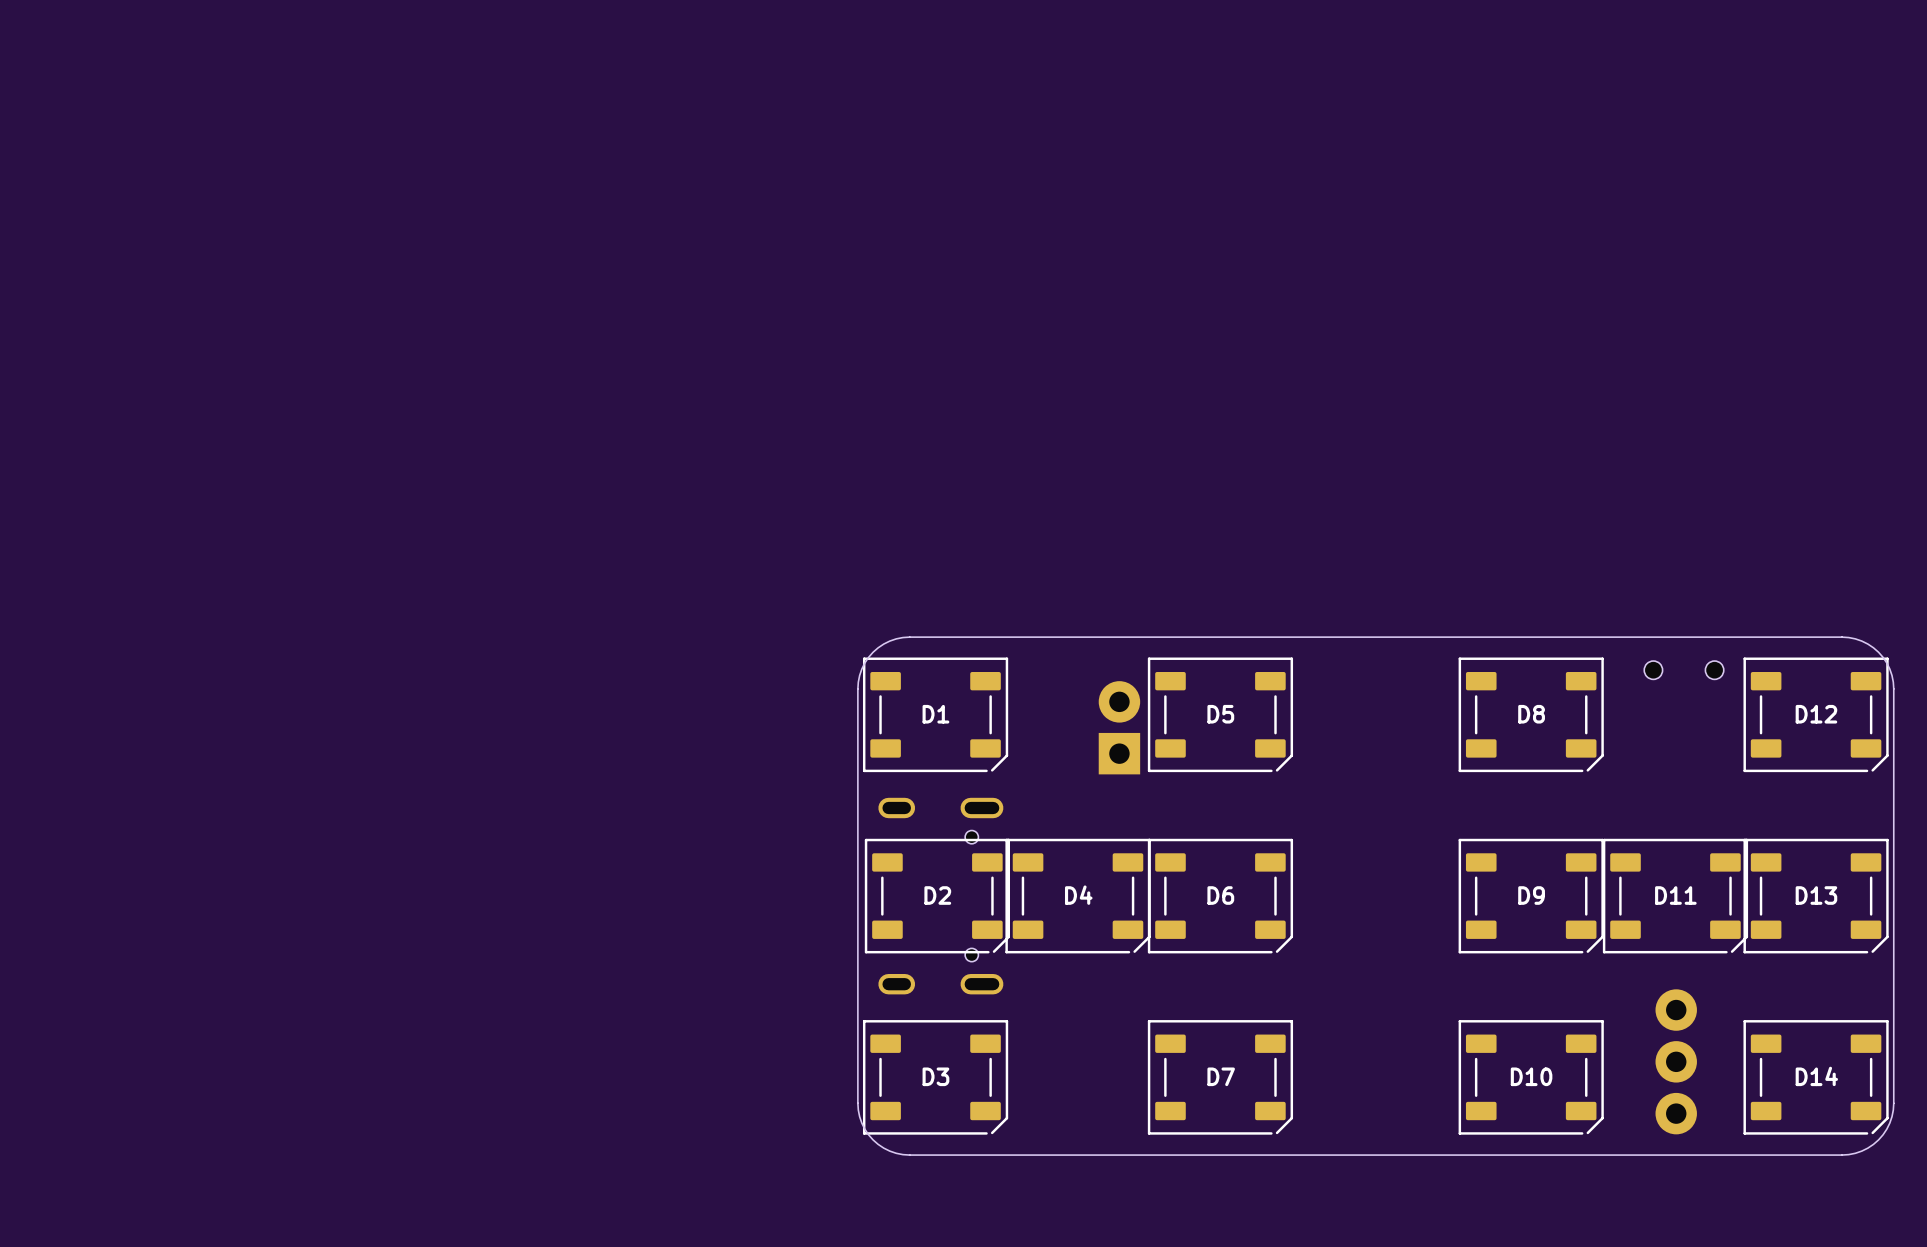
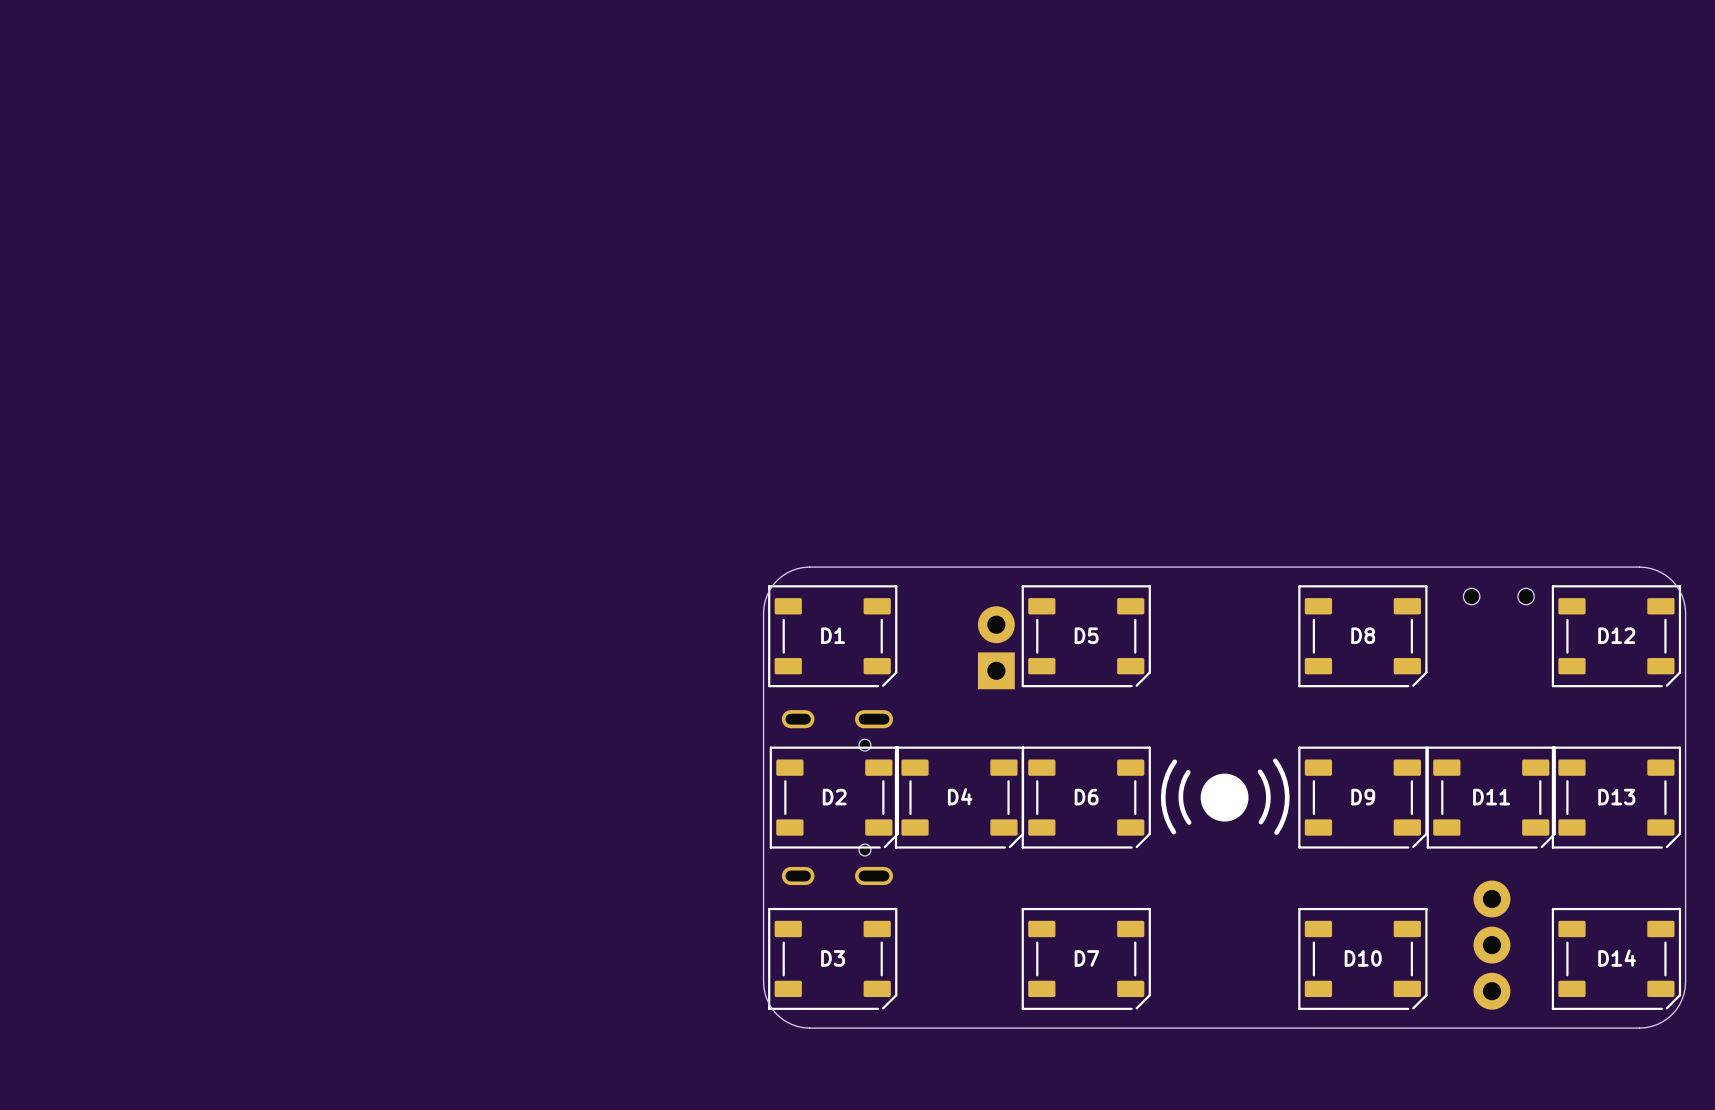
line: none -> (1275, 760) (1282, 774) (1287, 796) (1285, 811) (1276, 832)
line: none -> (1174, 761) (1167, 774) (1163, 796) (1164, 811) (1173, 832)
line: none -> (1188, 772) (1183, 781) (1180, 797) (1182, 808) (1189, 822)
line: none -> (1260, 771) (1265, 781) (1268, 796) (1267, 807) (1260, 822)
drawing: none -> [1200, 773, 1249, 822]

